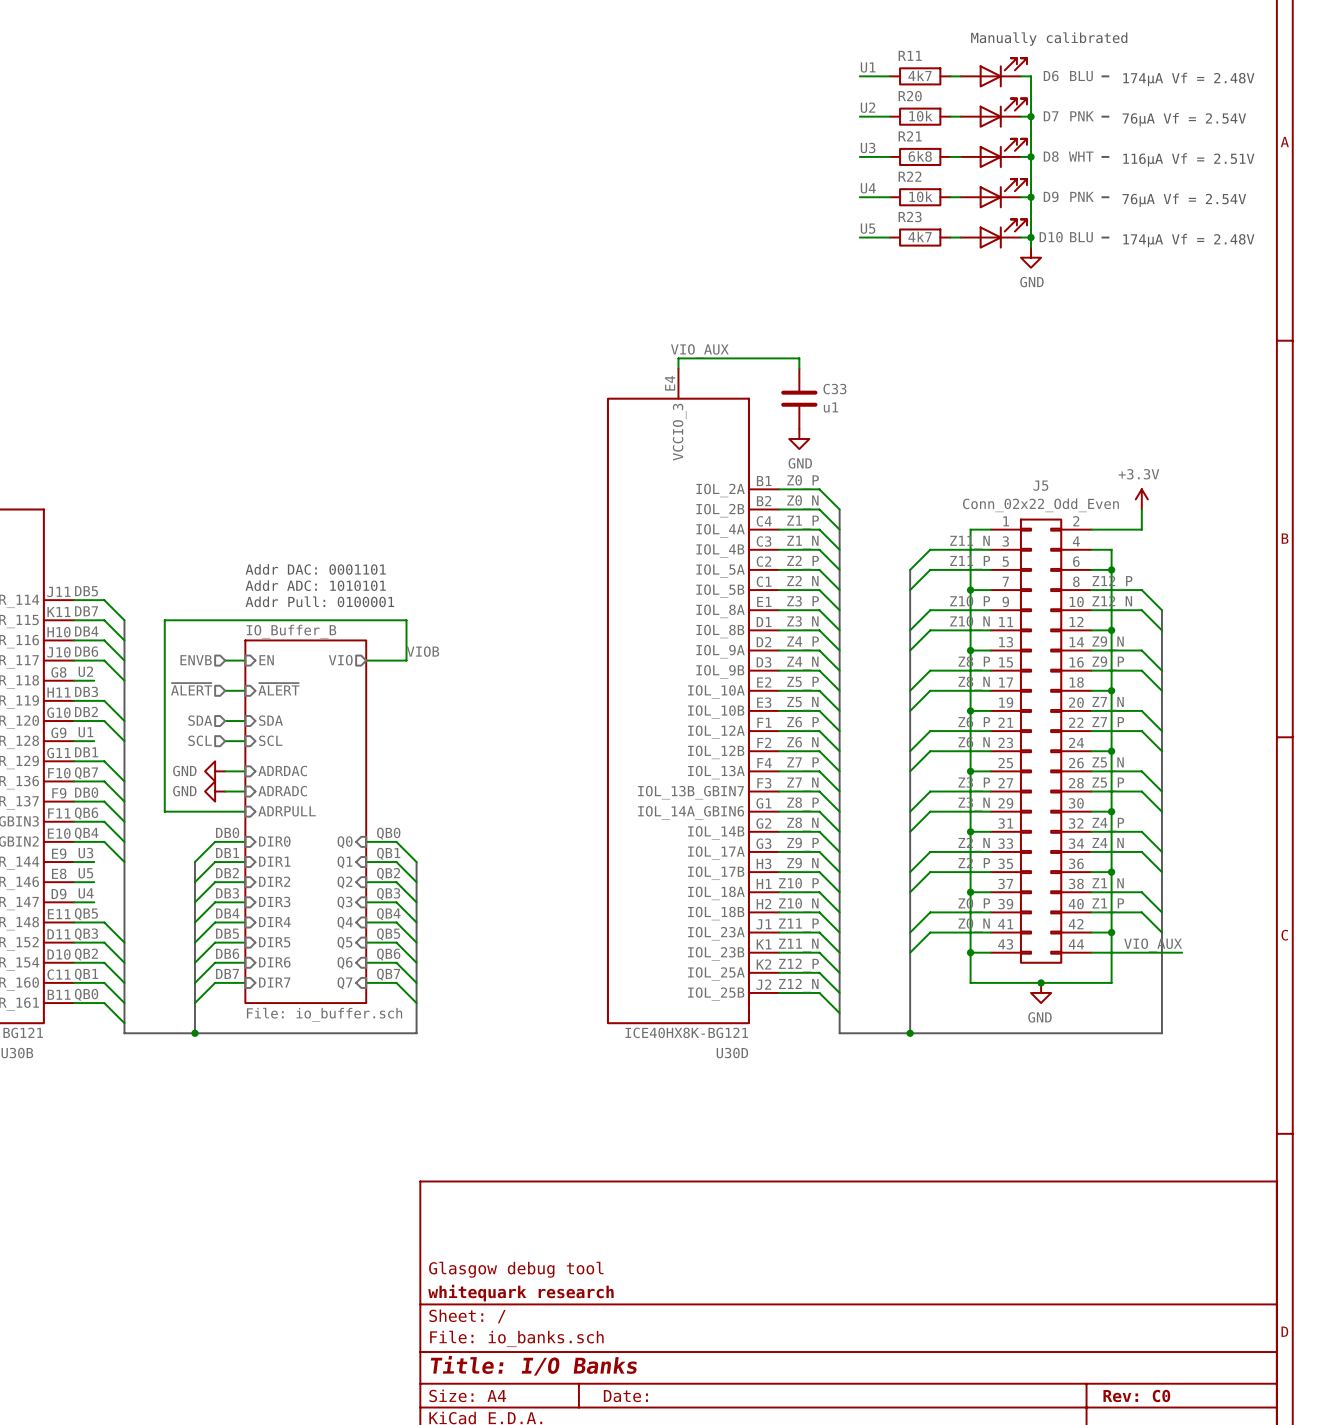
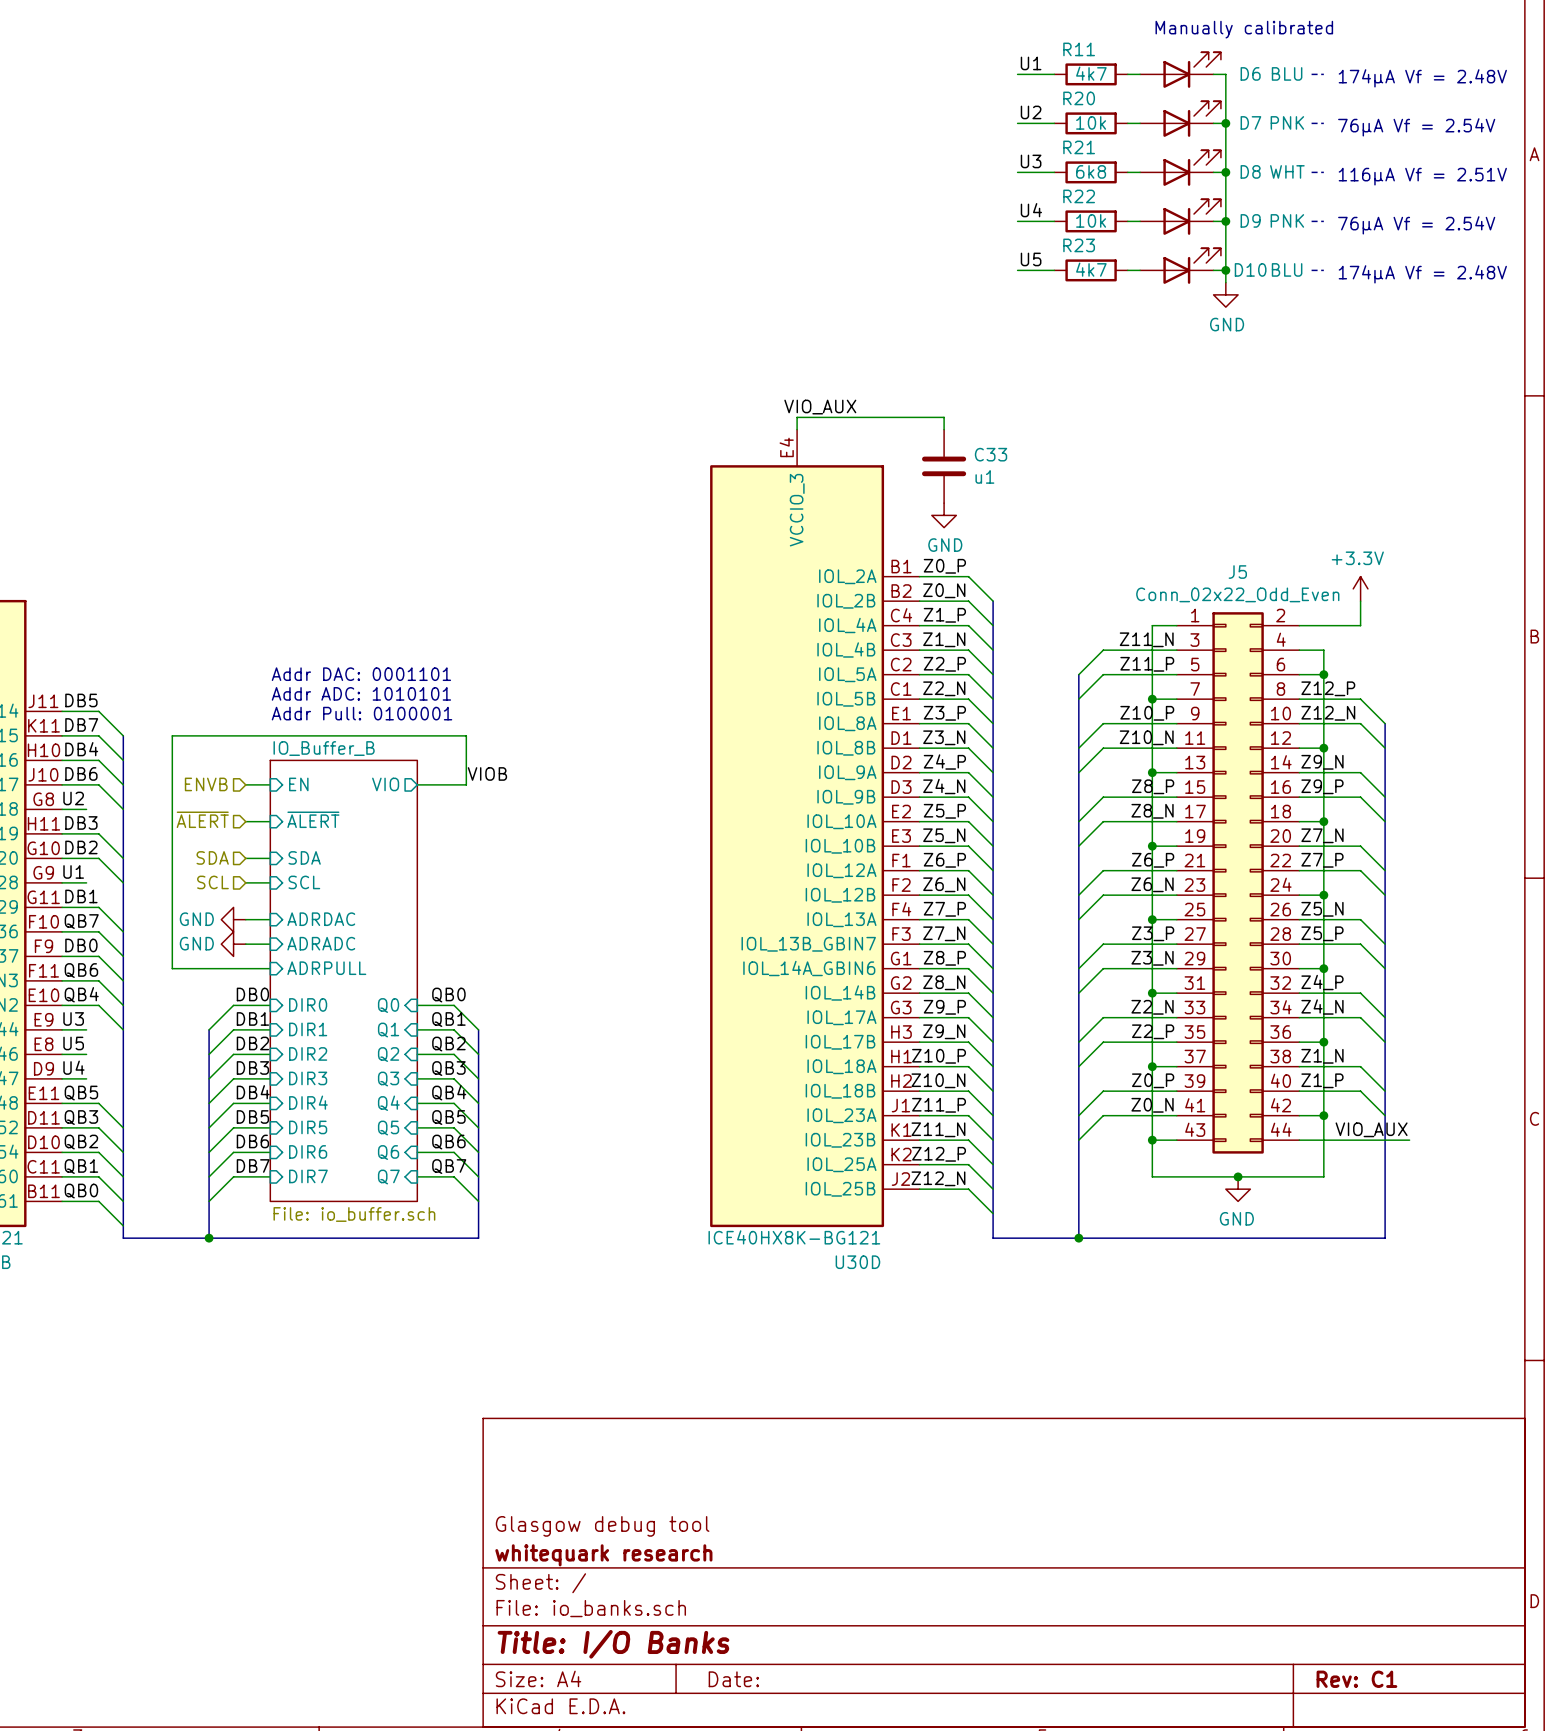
title block: Rev: C0 (1136, 1395) -> Rev: C1 (1356, 1679)

